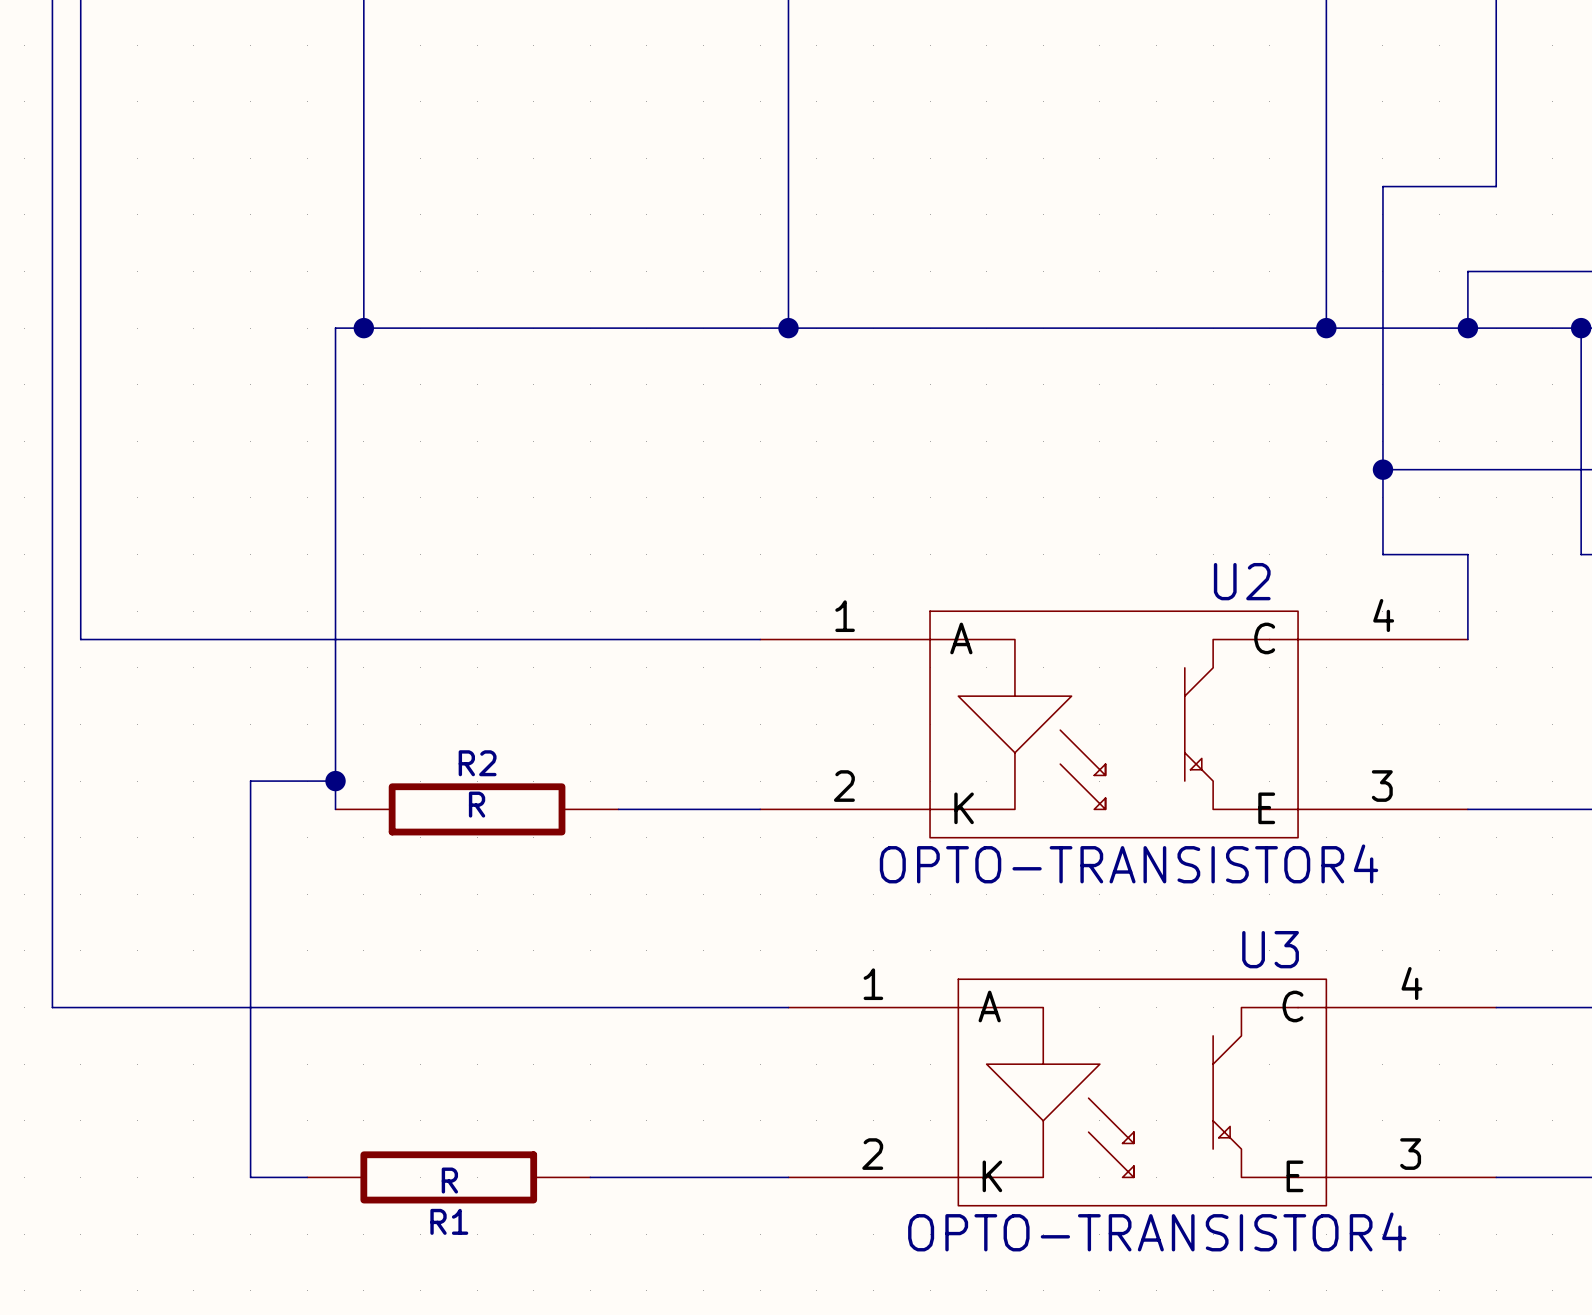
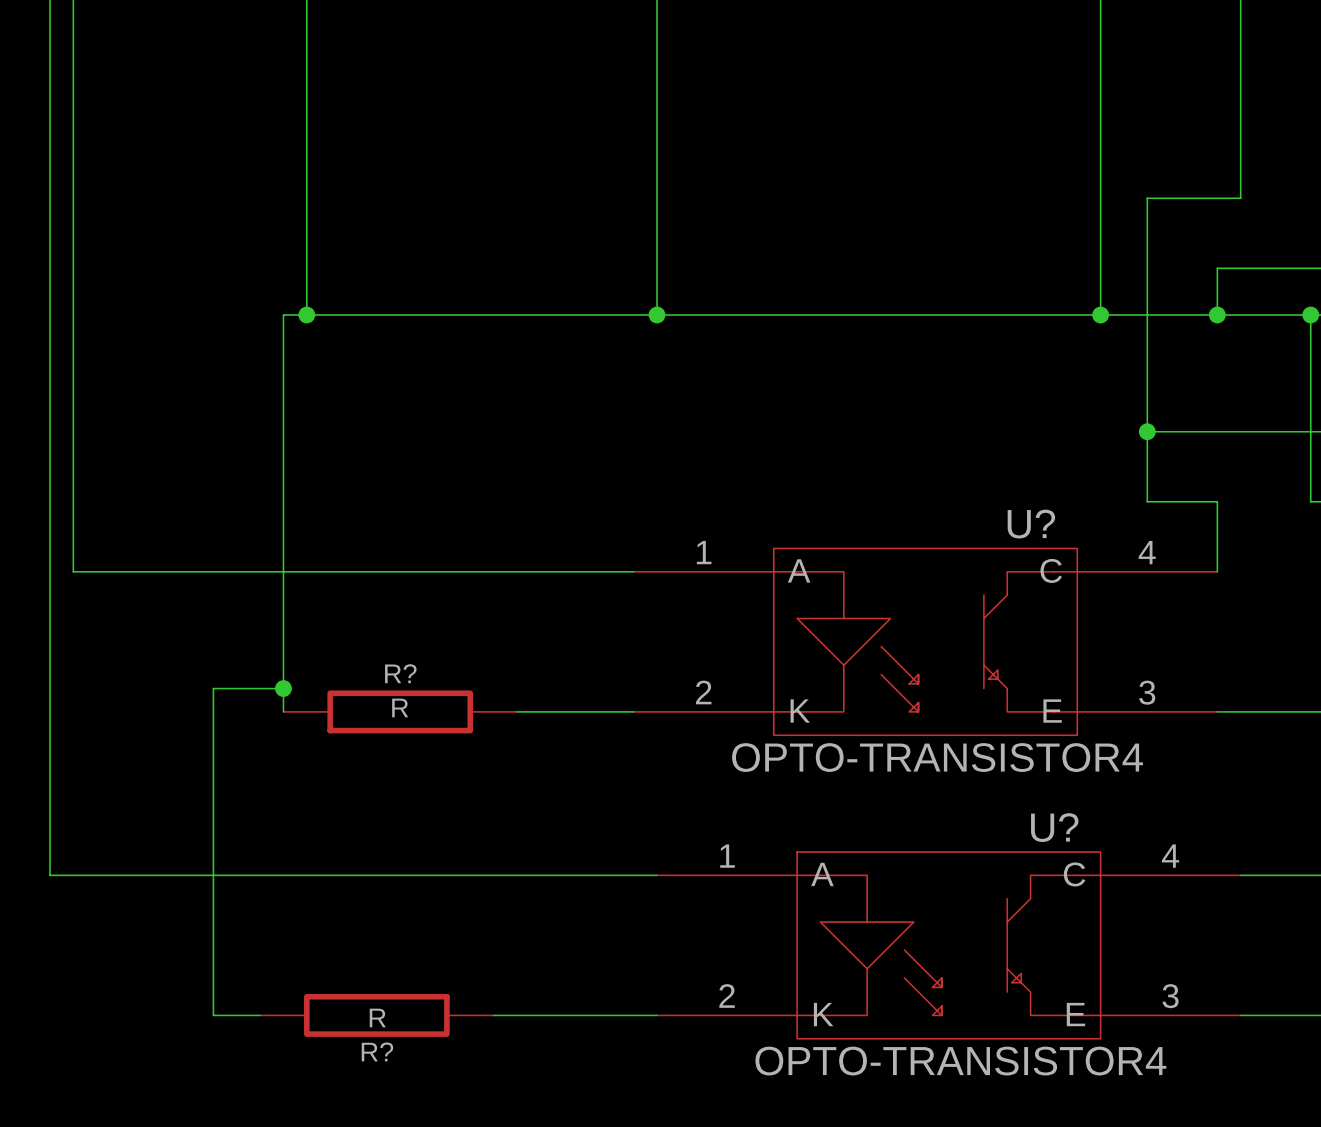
U2 name: U2 (1242, 581) -> U? (1031, 524)
R2 name: R2 (477, 763) -> R? (400, 673)
U3 name: U3 (1270, 949) -> U? (1054, 827)
R1 name: R1 (449, 1221) -> R? (377, 1051)

